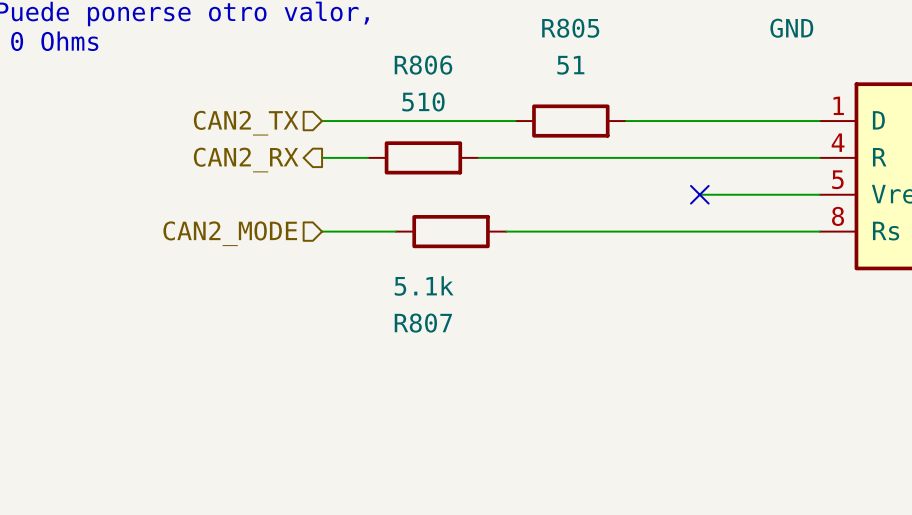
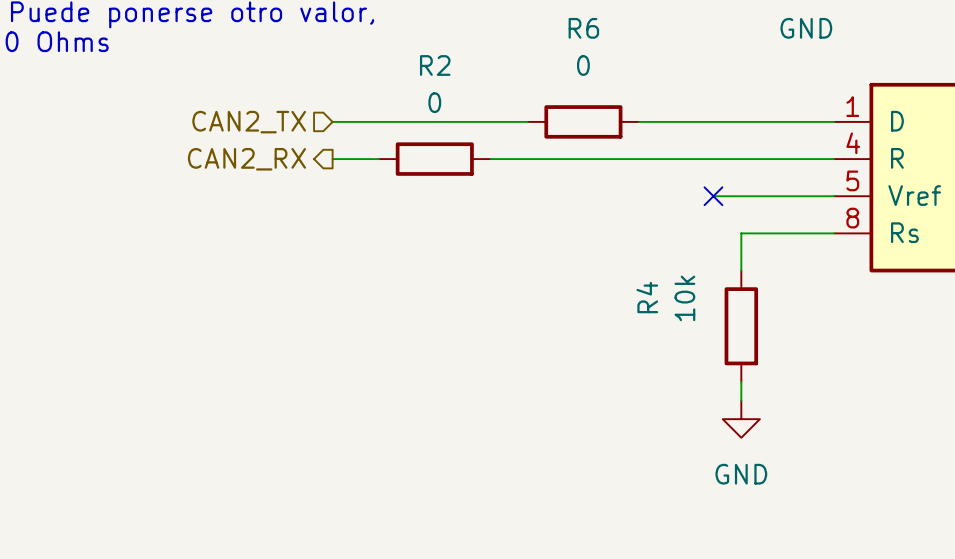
R805 name: R805 (570, 28) -> R6 (583, 28)
R806 name: R806 (423, 65) -> R2 (435, 65)
R805 value: 51 (570, 65) -> 0 (583, 65)
R806 value: 510 (423, 101) -> 0 (434, 102)
wire: (322, 231) (395, 231) -> none
R807: 5.1k (451, 231) -> none
wire: (506, 231) (727, 231) -> (741, 270) (741, 233)
hierarchical label: CAN2_MODE (230, 233) -> none
R4: none -> 10k (741, 326)
wire: none -> (741, 382) (741, 400)
power symbol: none -> GND (741, 419)

